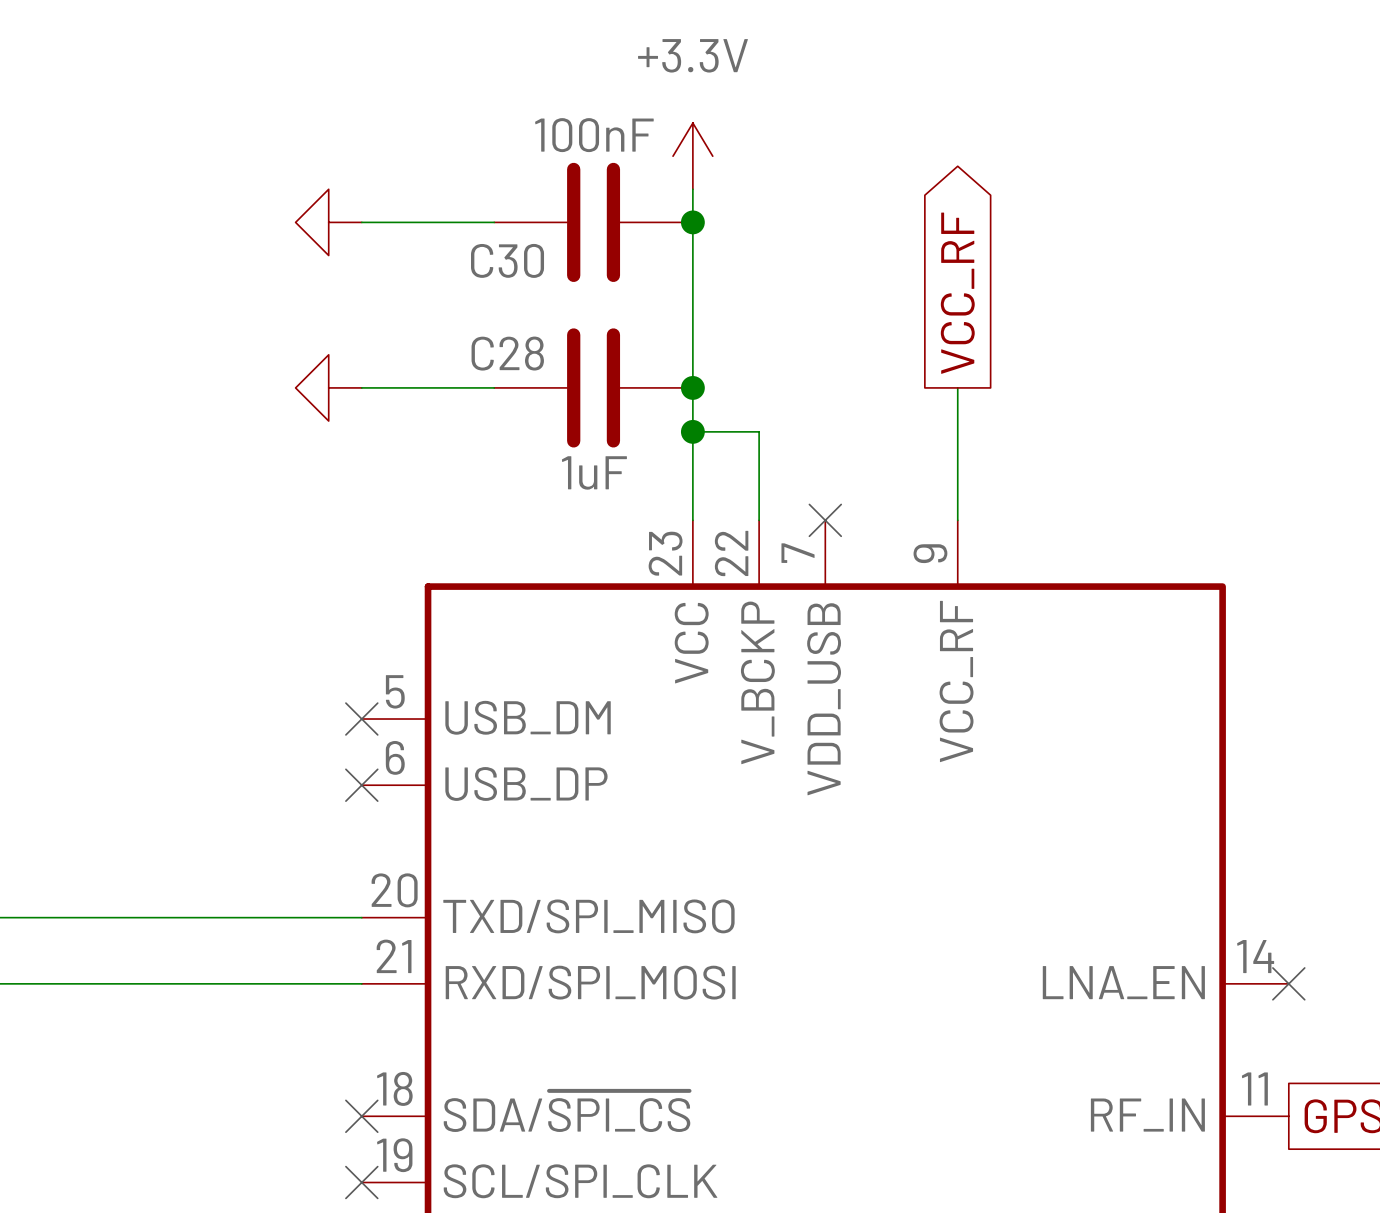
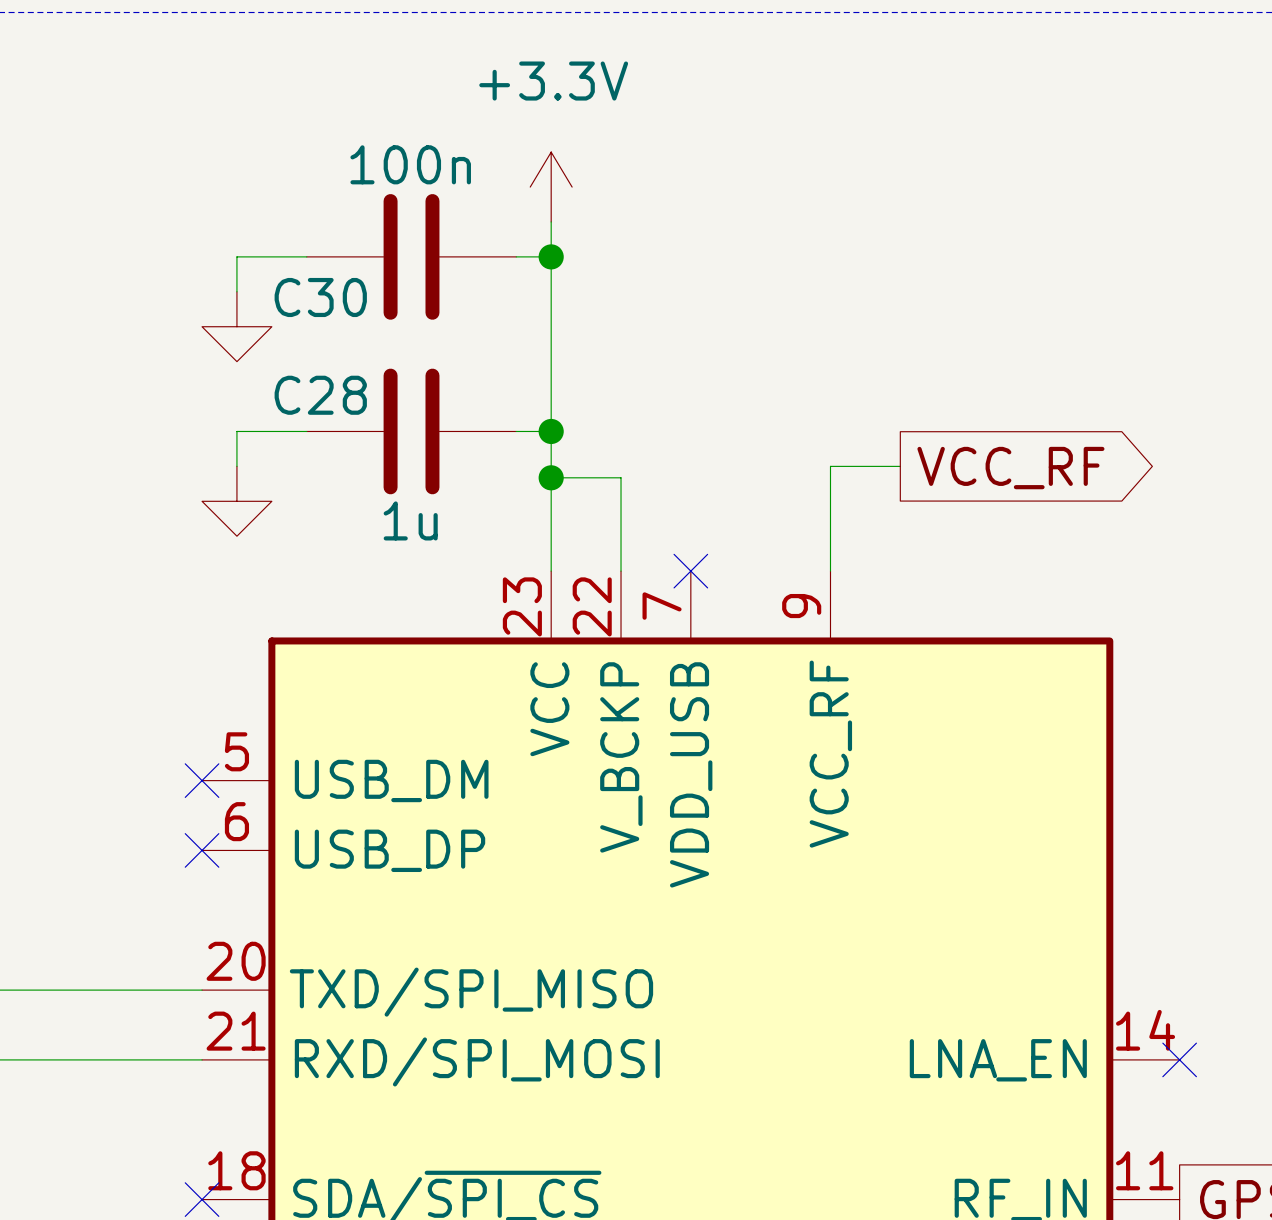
C30 value: 100nF (594, 135) -> 100n (410, 164)
power symbol: (328, 222) -> none
wire: (361, 222) (394, 222) -> (236, 291) (236, 256)
C30 position: (593, 222) -> (411, 256)
power symbol: none -> (236, 326)
global label rotation: 0° (957, 293) -> 90° clockwise (1010, 468)
power symbol: (328, 387) -> none
wire: (361, 387) (394, 387) -> (236, 466) (236, 431)
C28 position: (593, 387) -> (411, 431)
wire: (957, 387) (957, 421) -> (900, 466) (830, 466)
power symbol: none -> (236, 501)
C28 value: 1uF (594, 472) -> 1u (410, 520)

